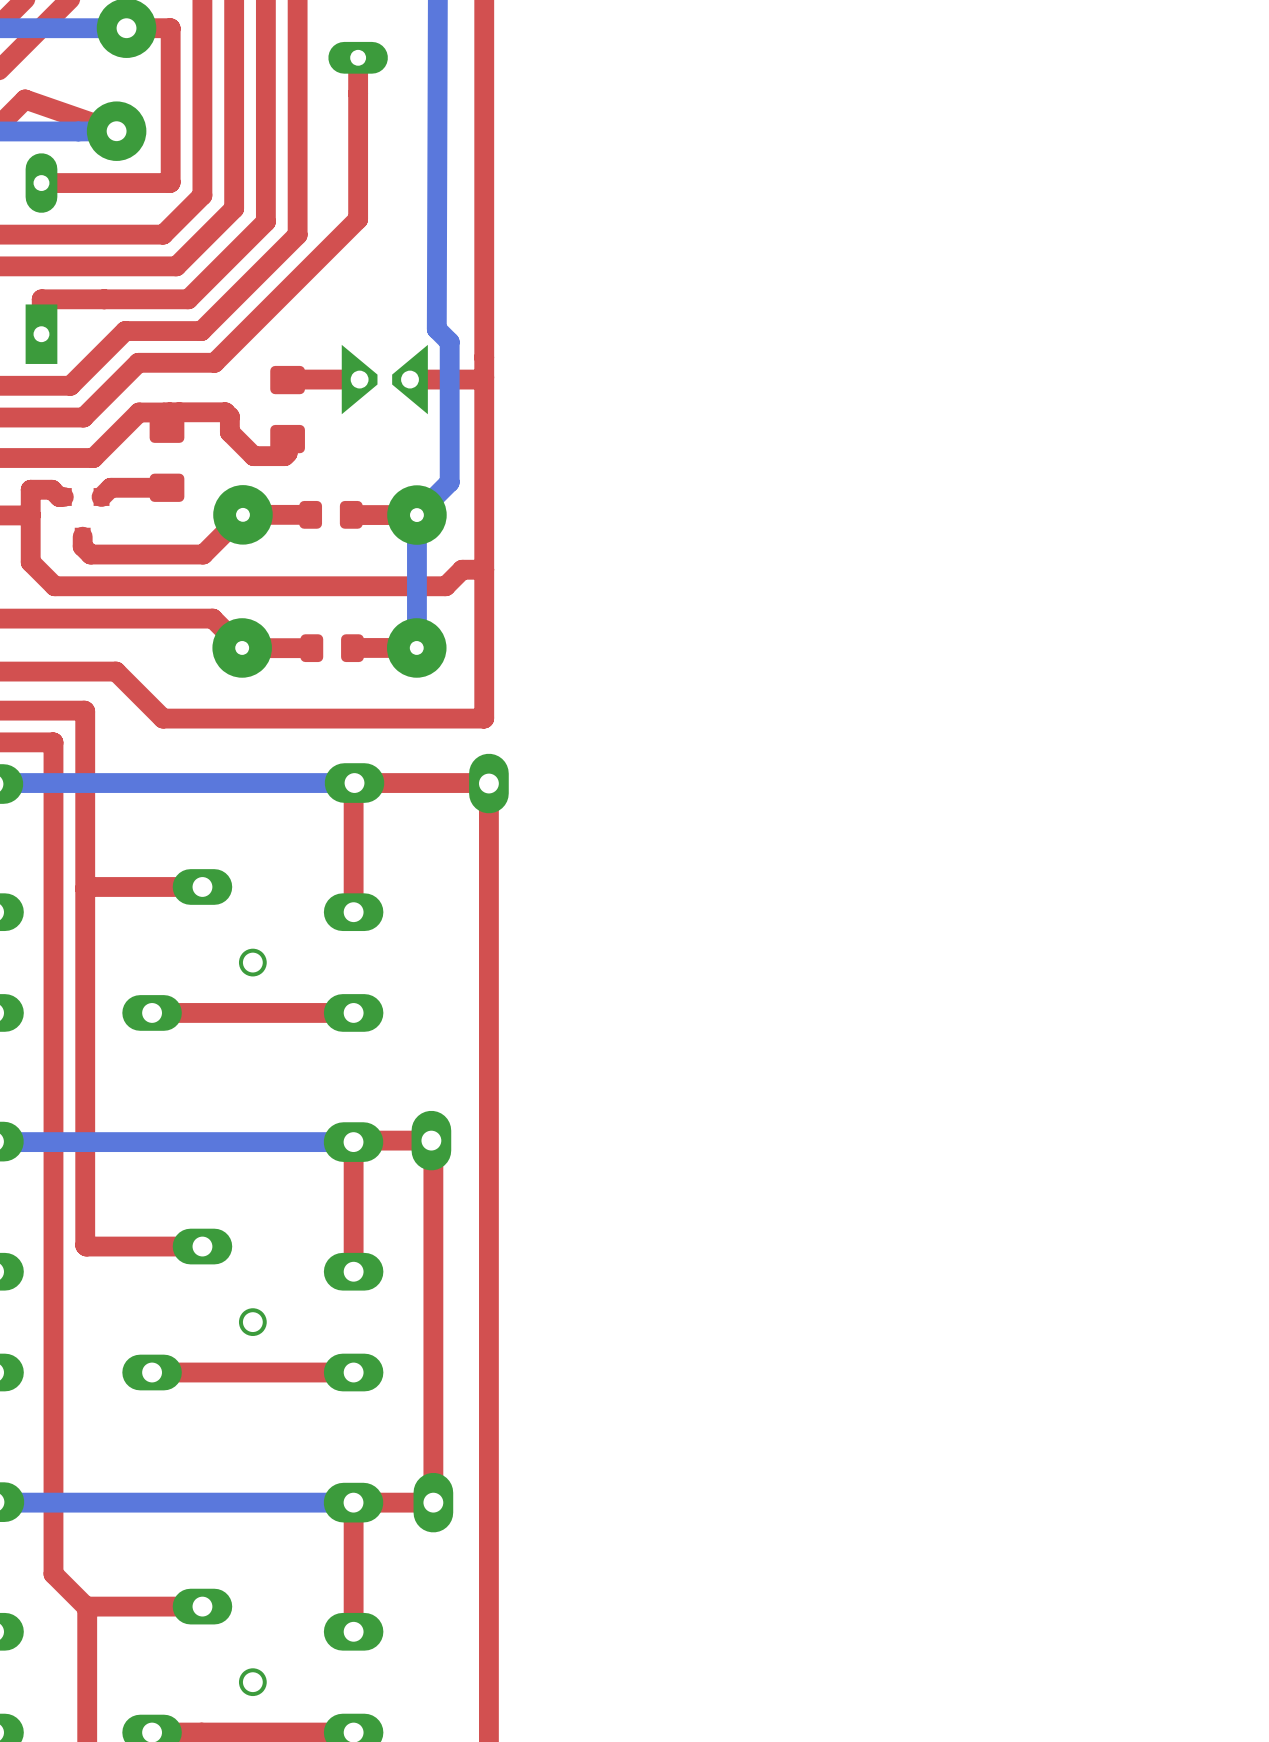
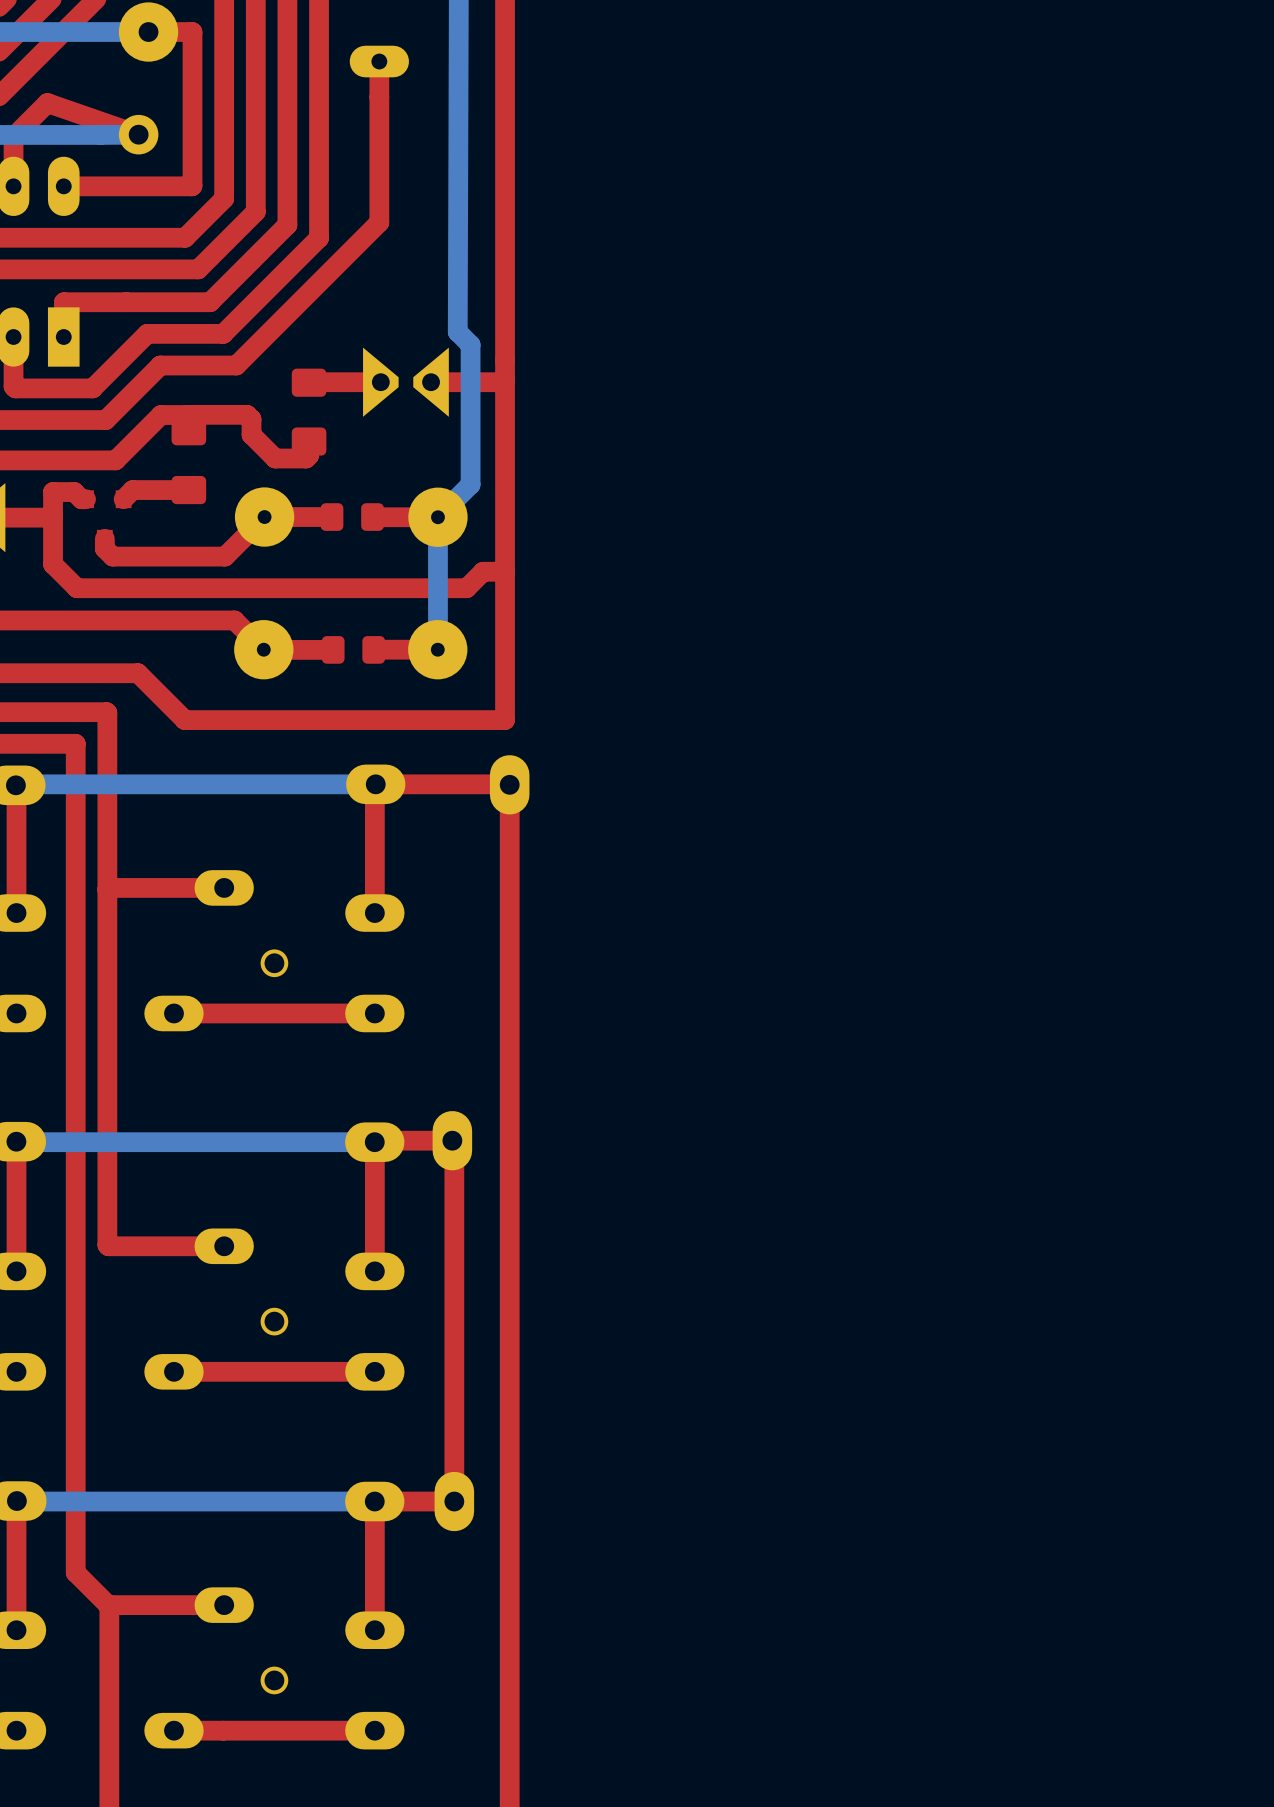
part footprint: [86, 101, 147, 161] -> [118, 114, 159, 155]

